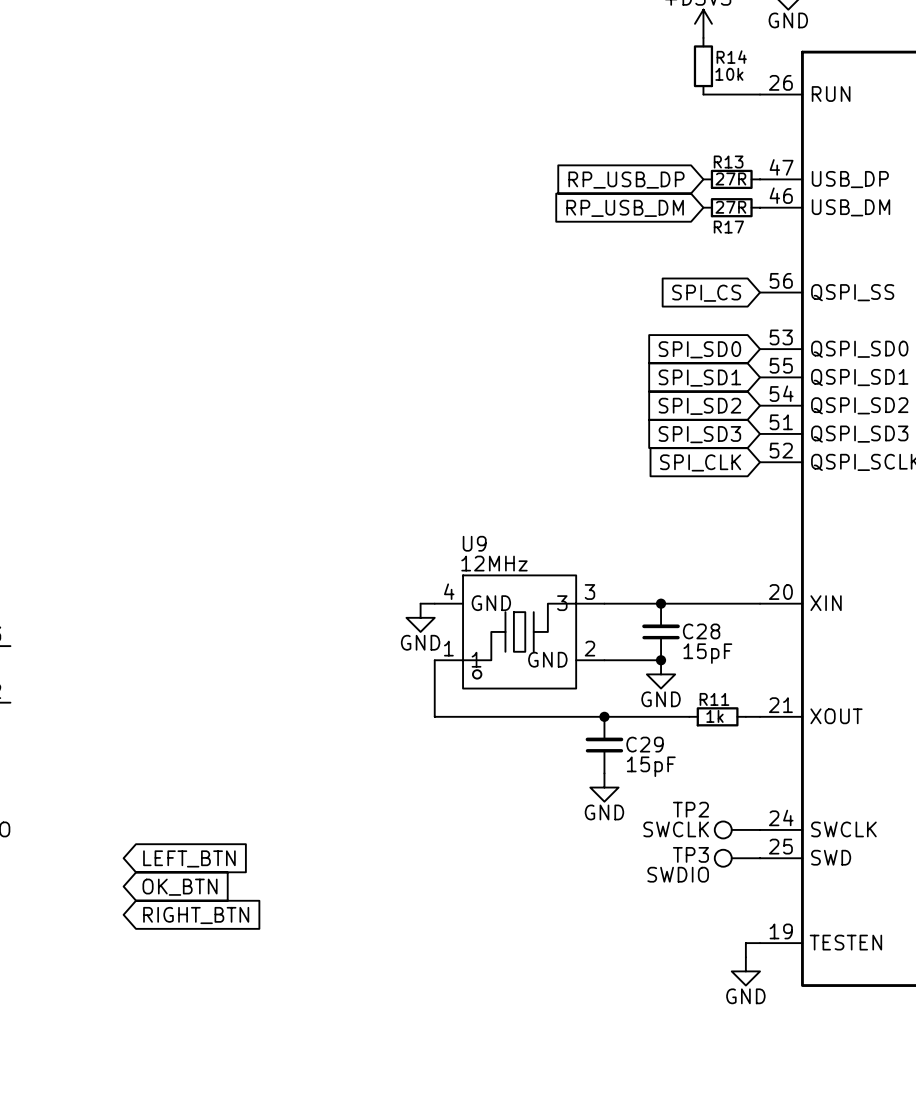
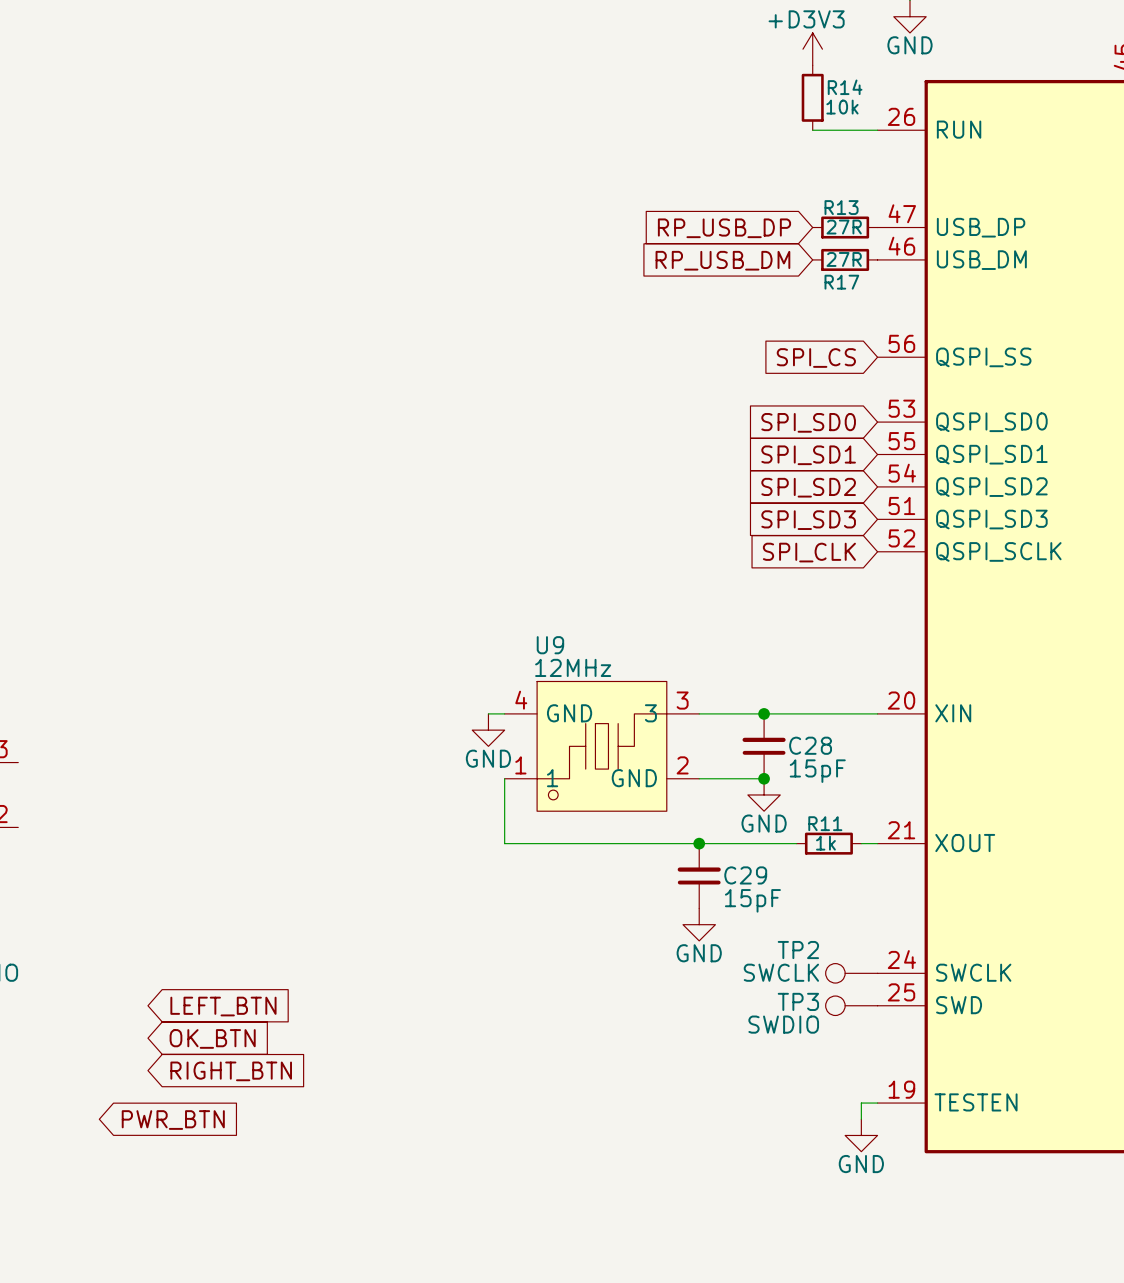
global label: none -> PWR_BTN (173, 1120)

